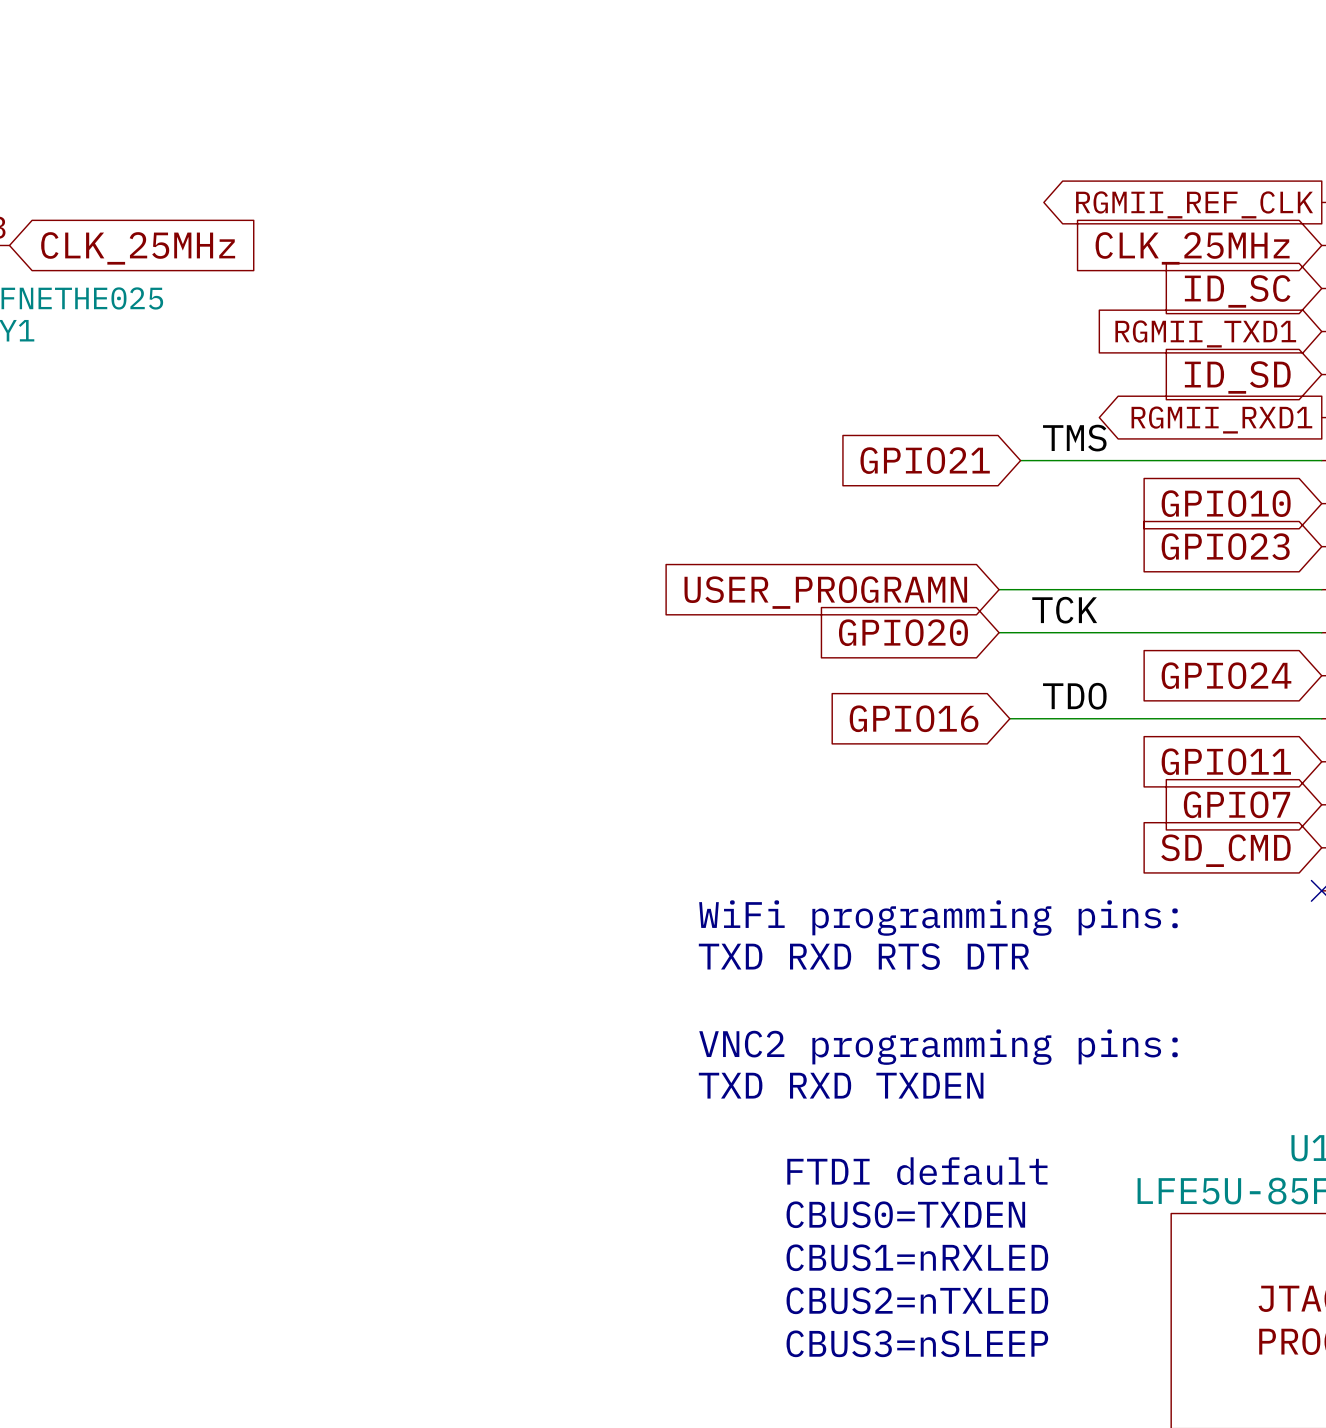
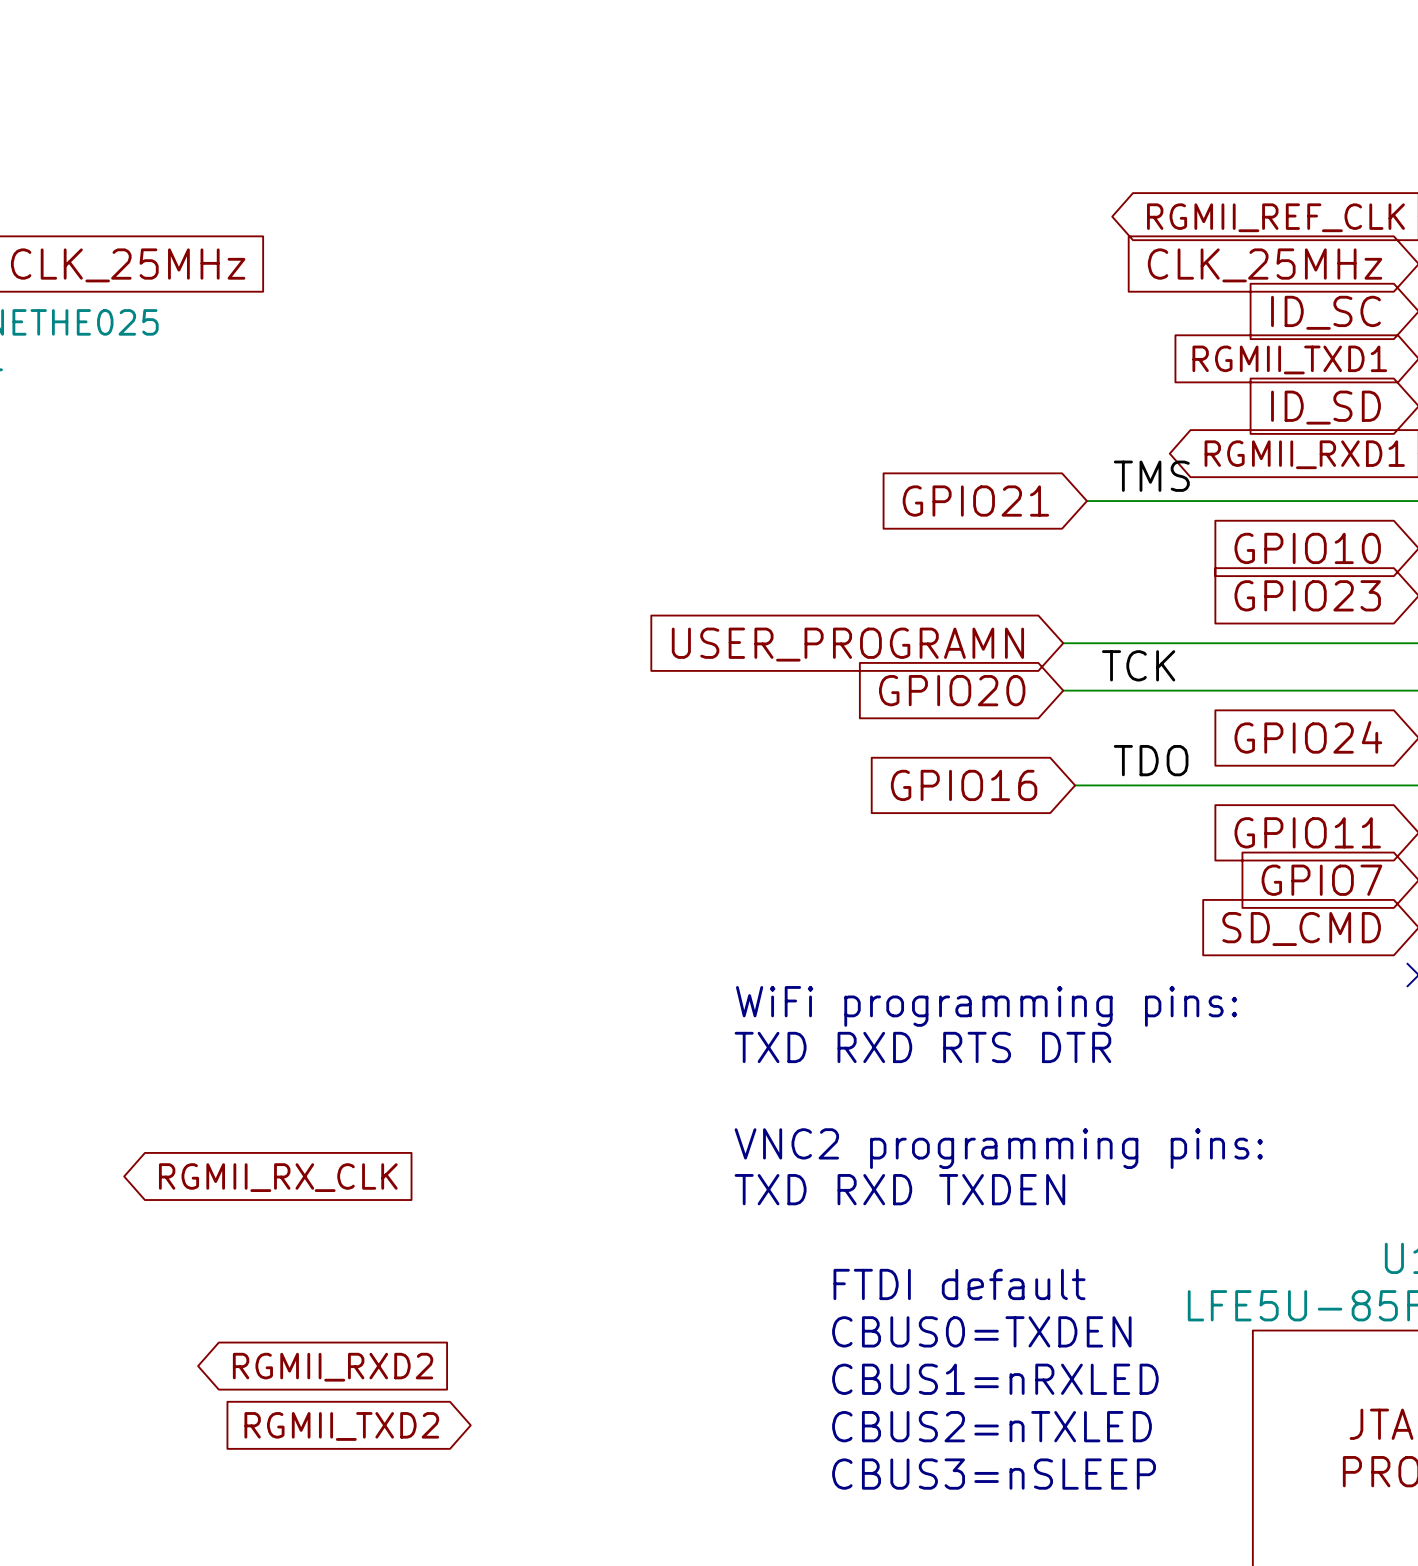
global label: none -> RGMII_RX_CLK (278, 1177)
global label: none -> RGMII_RXD2 (333, 1367)
global label: none -> RGMII_TXD2 (341, 1426)

